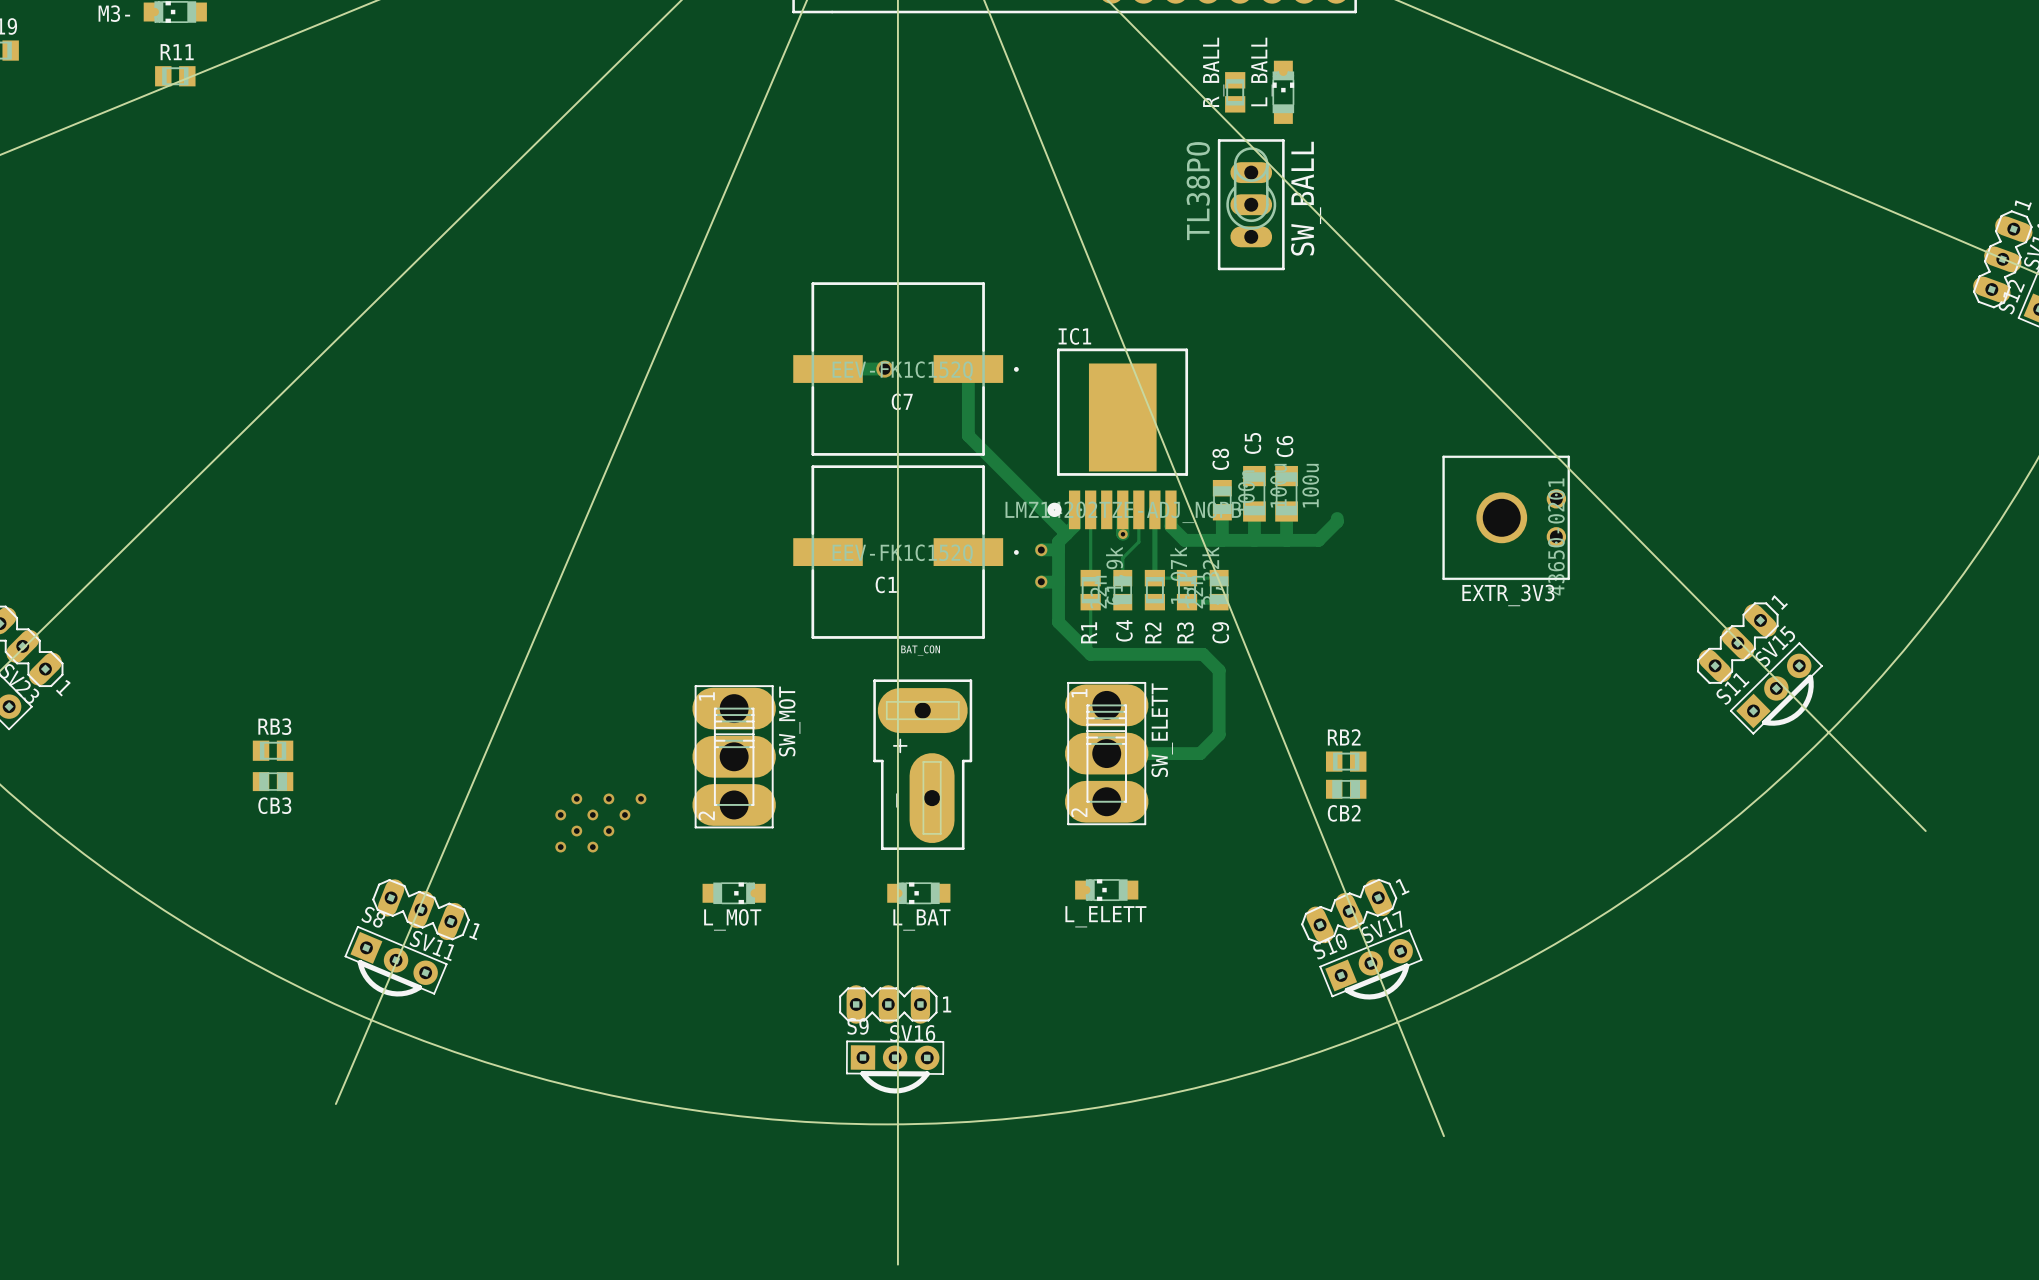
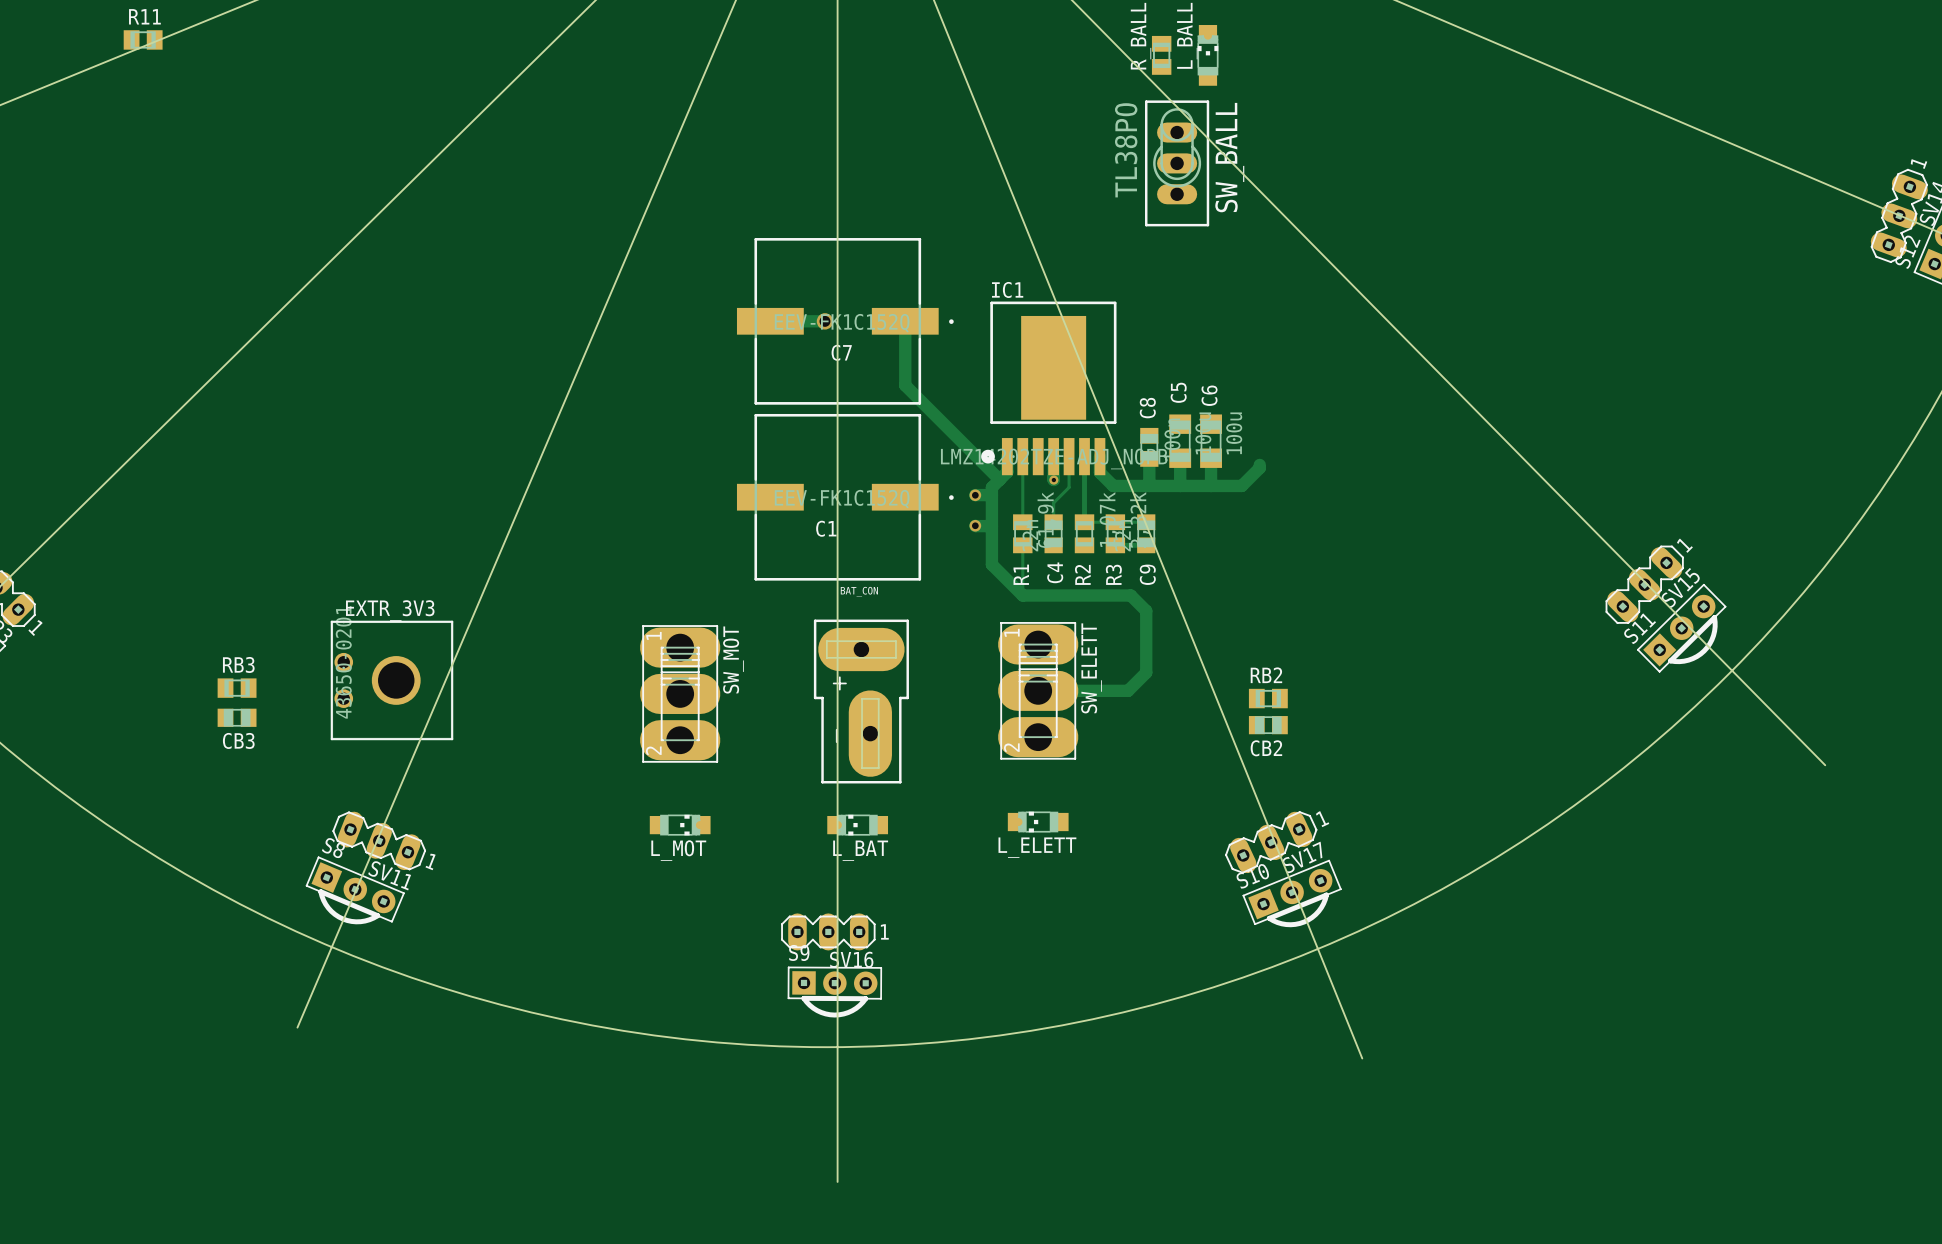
EXTR_3V3 rotation: 0° (1506, 517) -> 180° (391, 680)
EXTR_3V3 position: (1506, 517) -> (391, 680)
via: (576, 798) -> none
via: (608, 798) -> none
via: (641, 798) -> none
via: (560, 814) -> none
via: (592, 814) -> none
via: (624, 814) -> none
via: (576, 831) -> none
via: (608, 831) -> none
via: (560, 847) -> none
via: (592, 847) -> none

